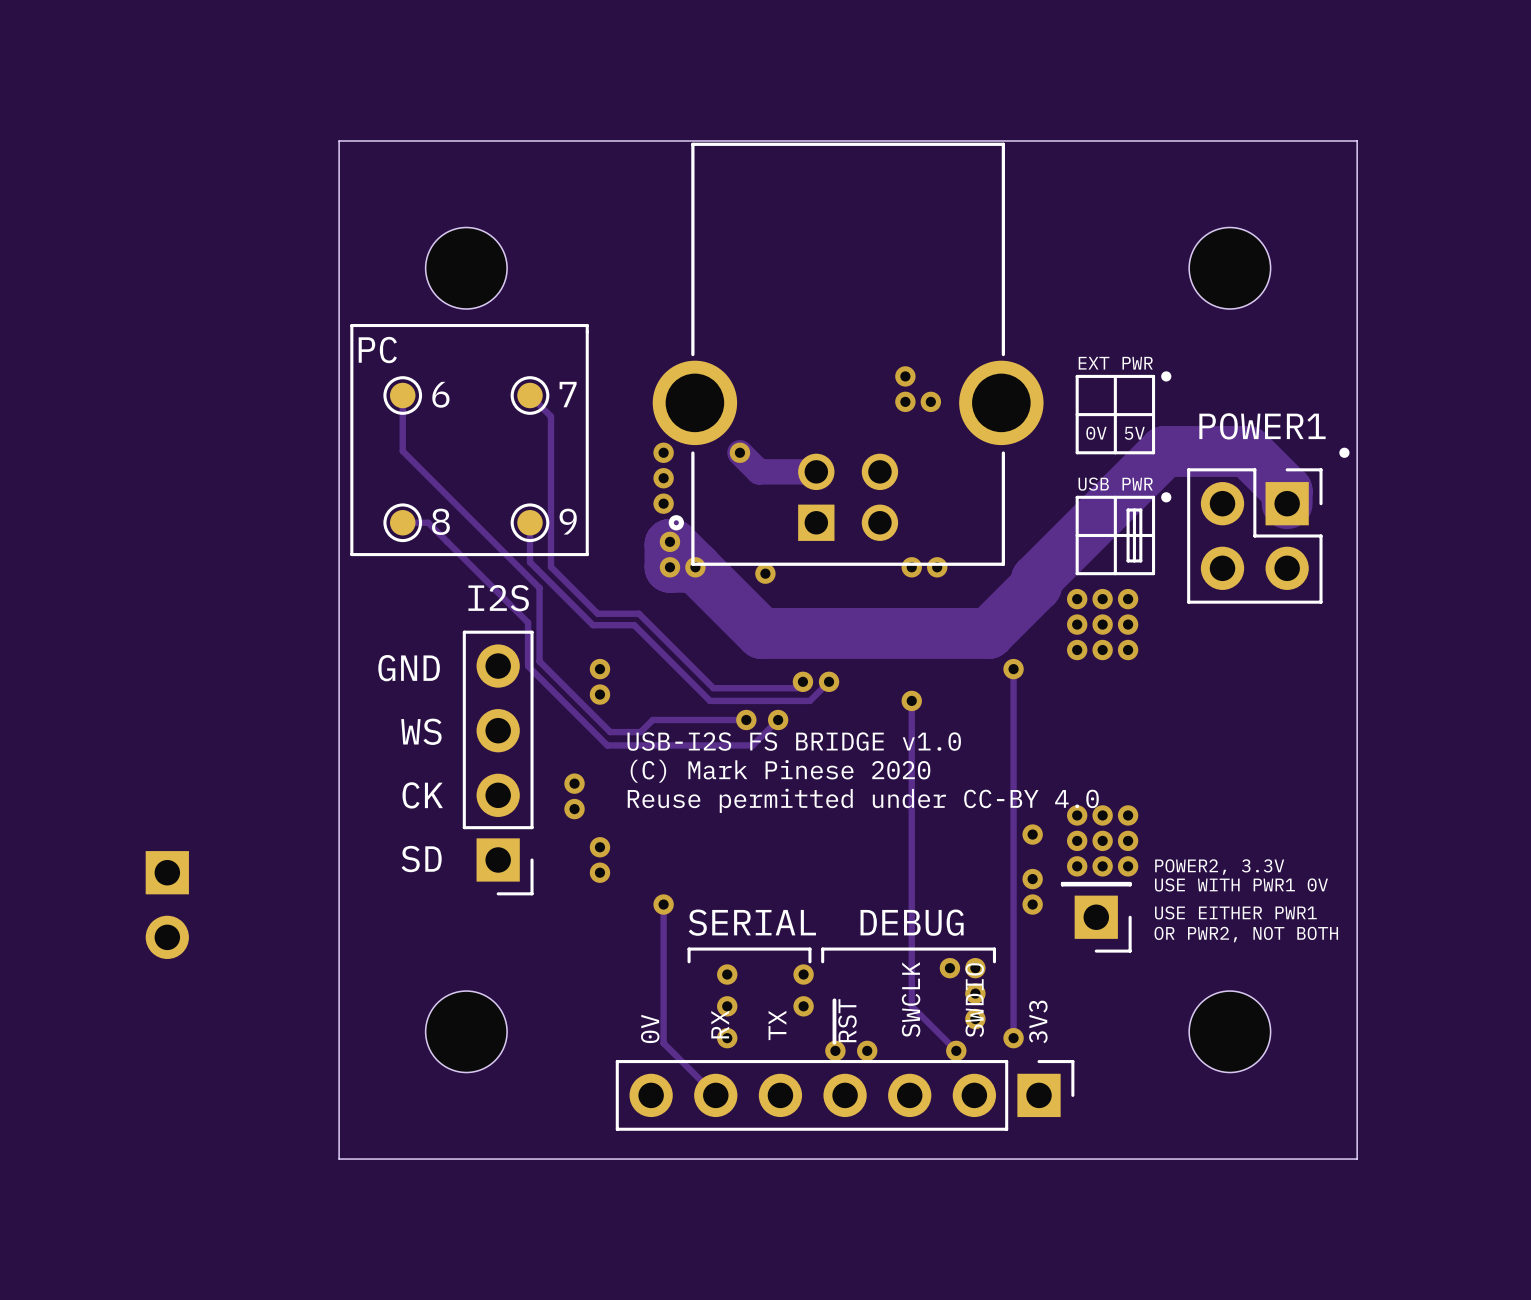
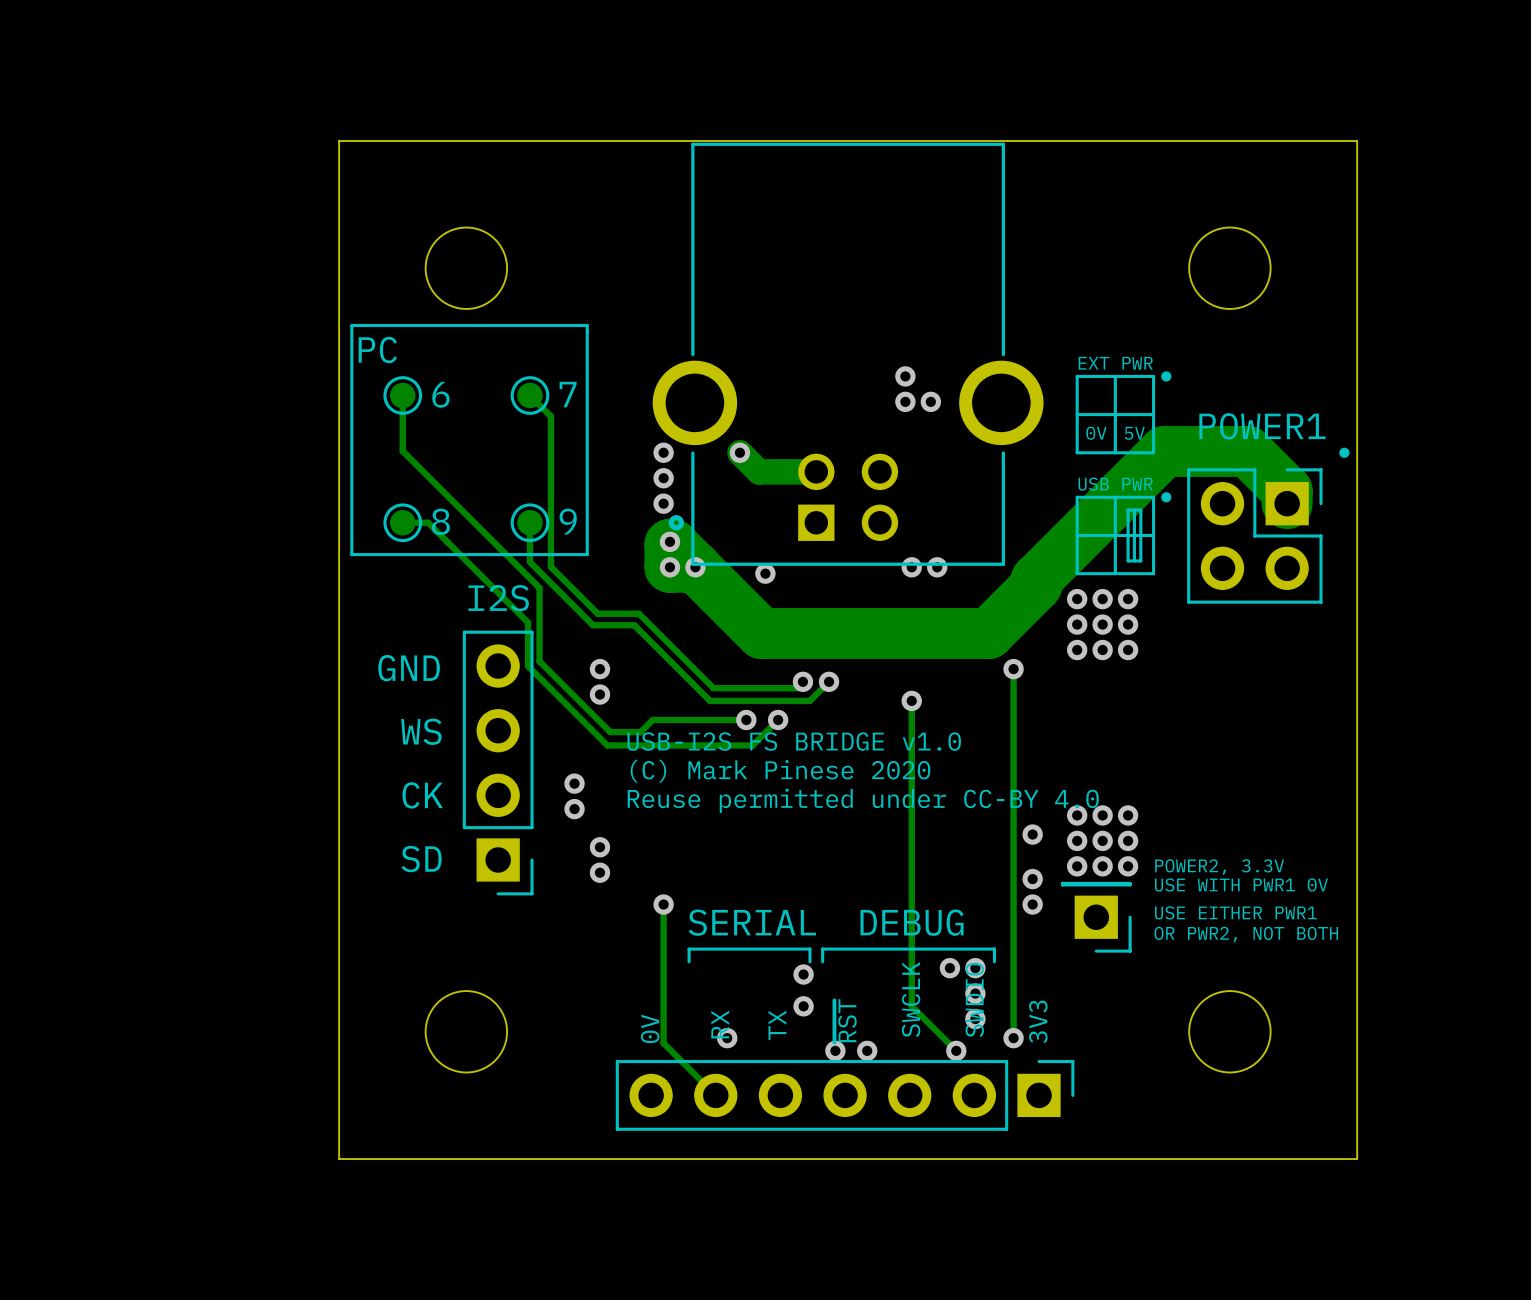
part: (167, 905) -> none
via: (727, 974) -> none
via: (727, 1006) -> none

